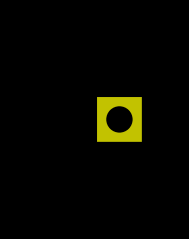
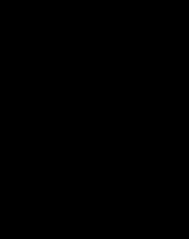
part: (119, 119) -> none

